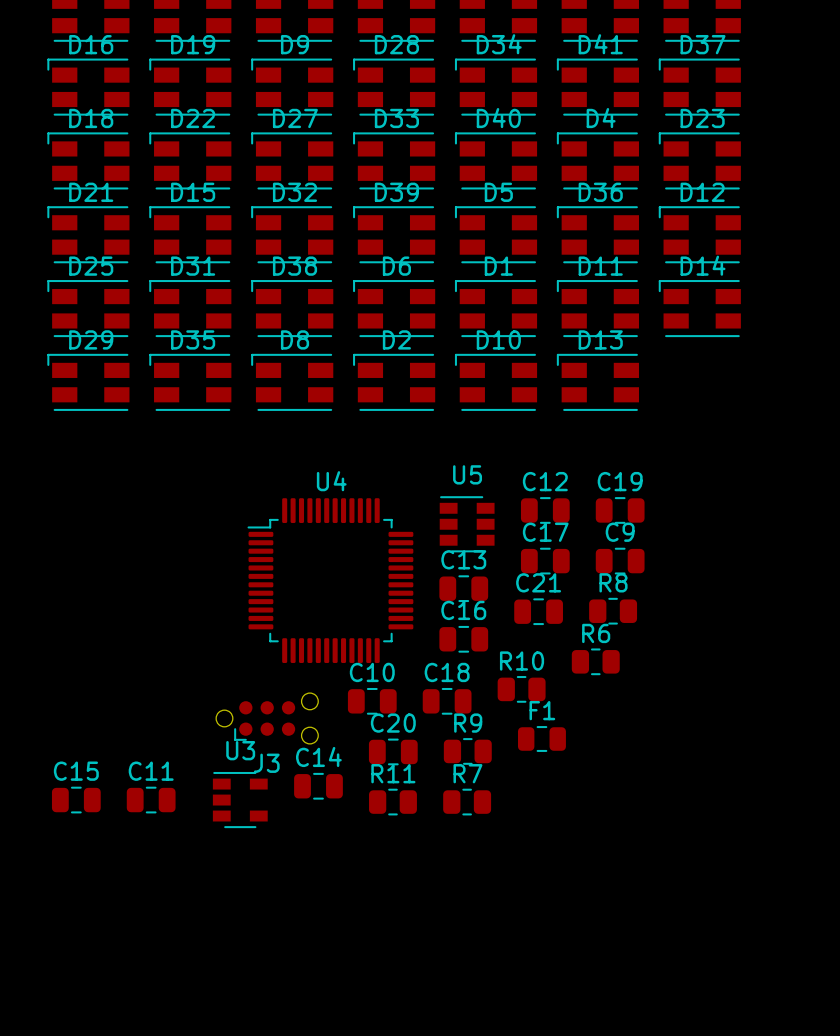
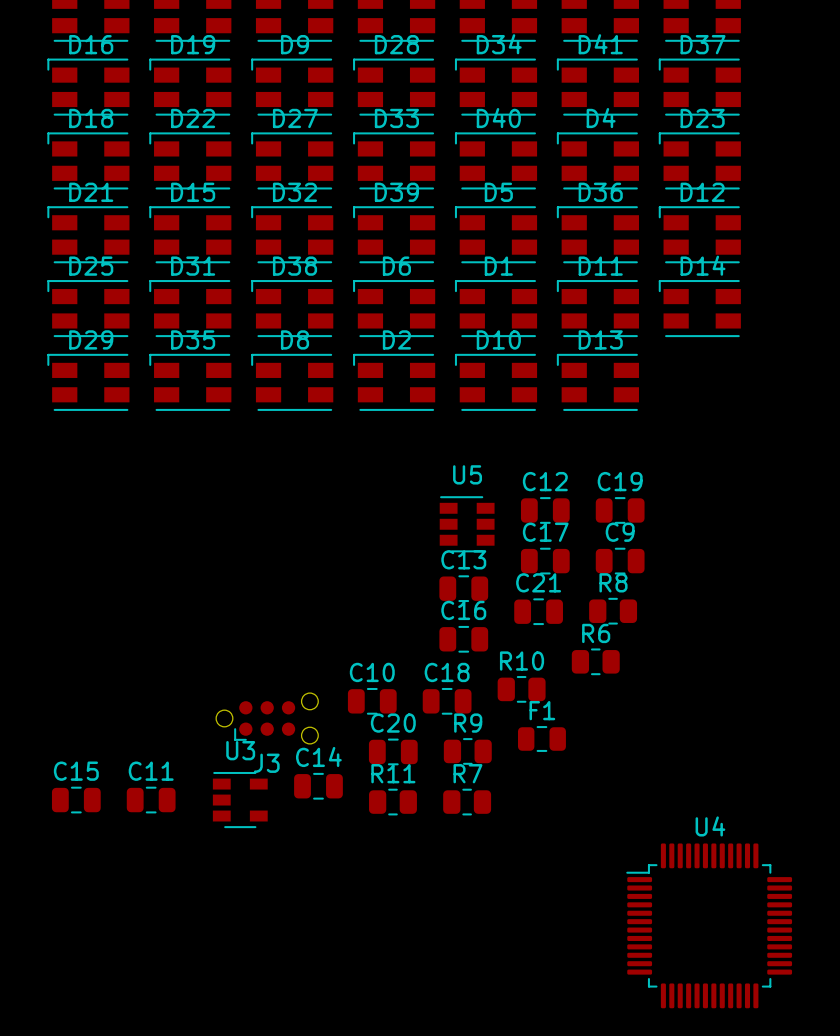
U4 position: (330, 580) -> (709, 925)

